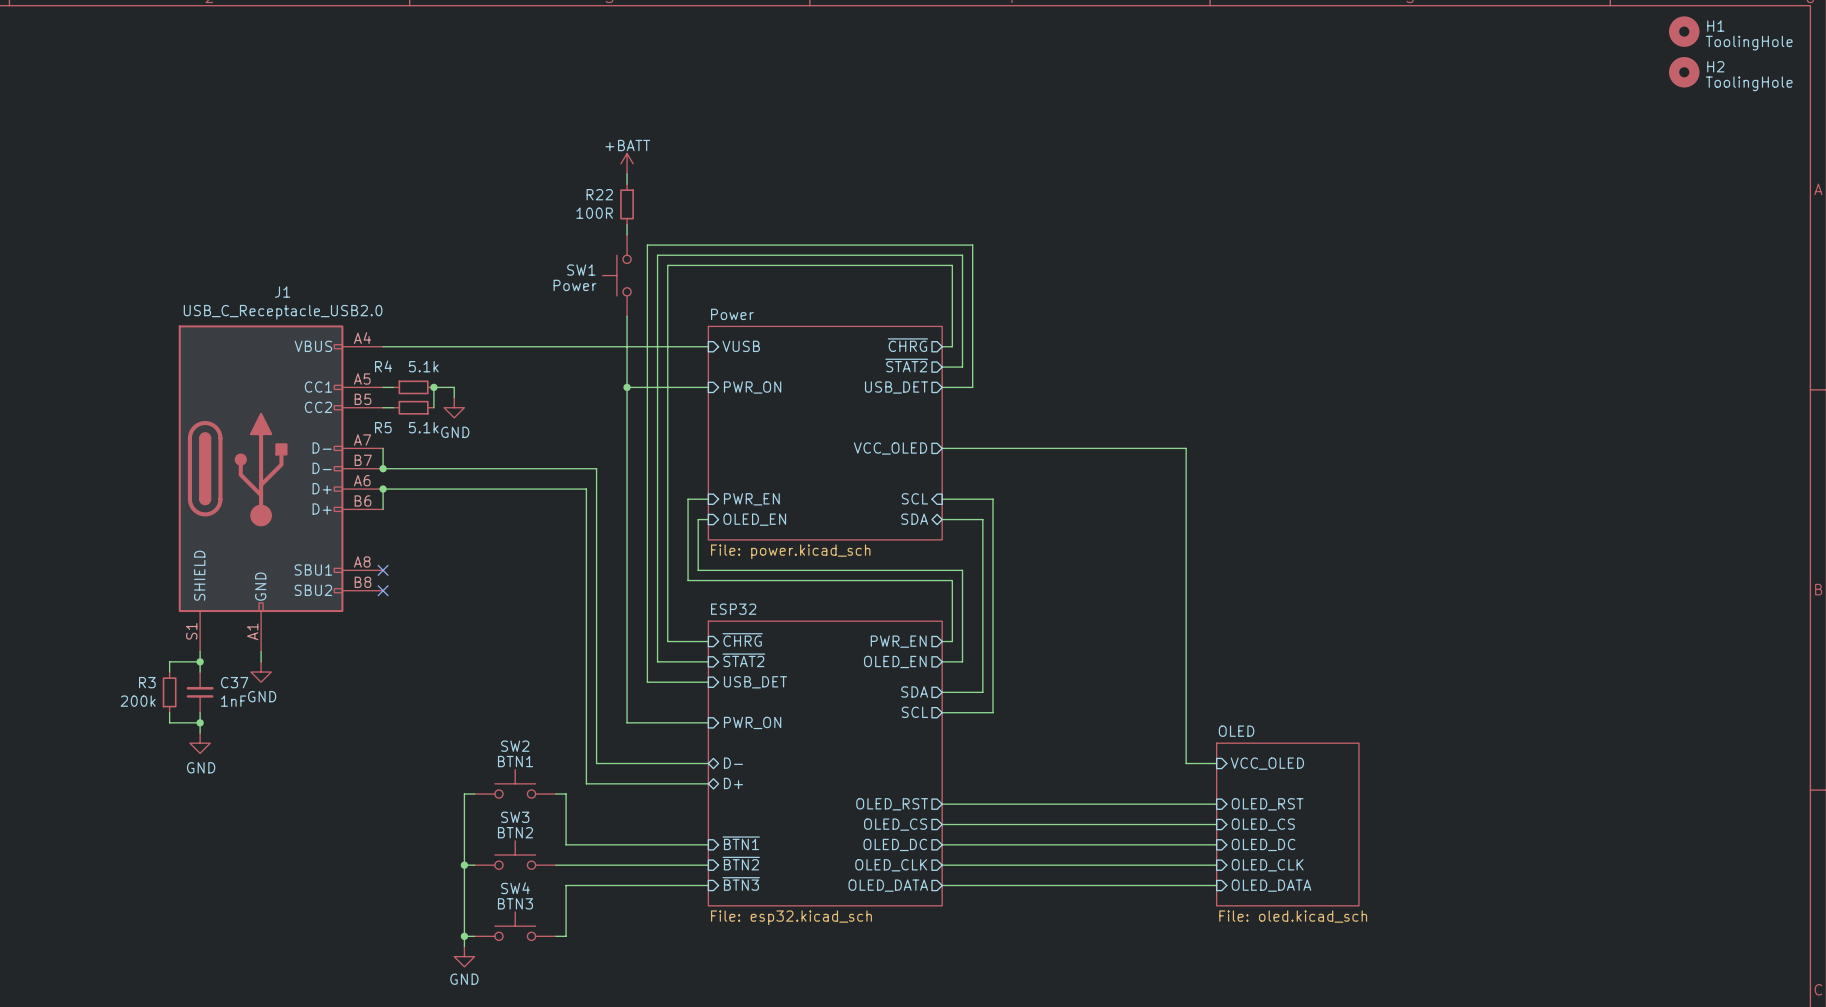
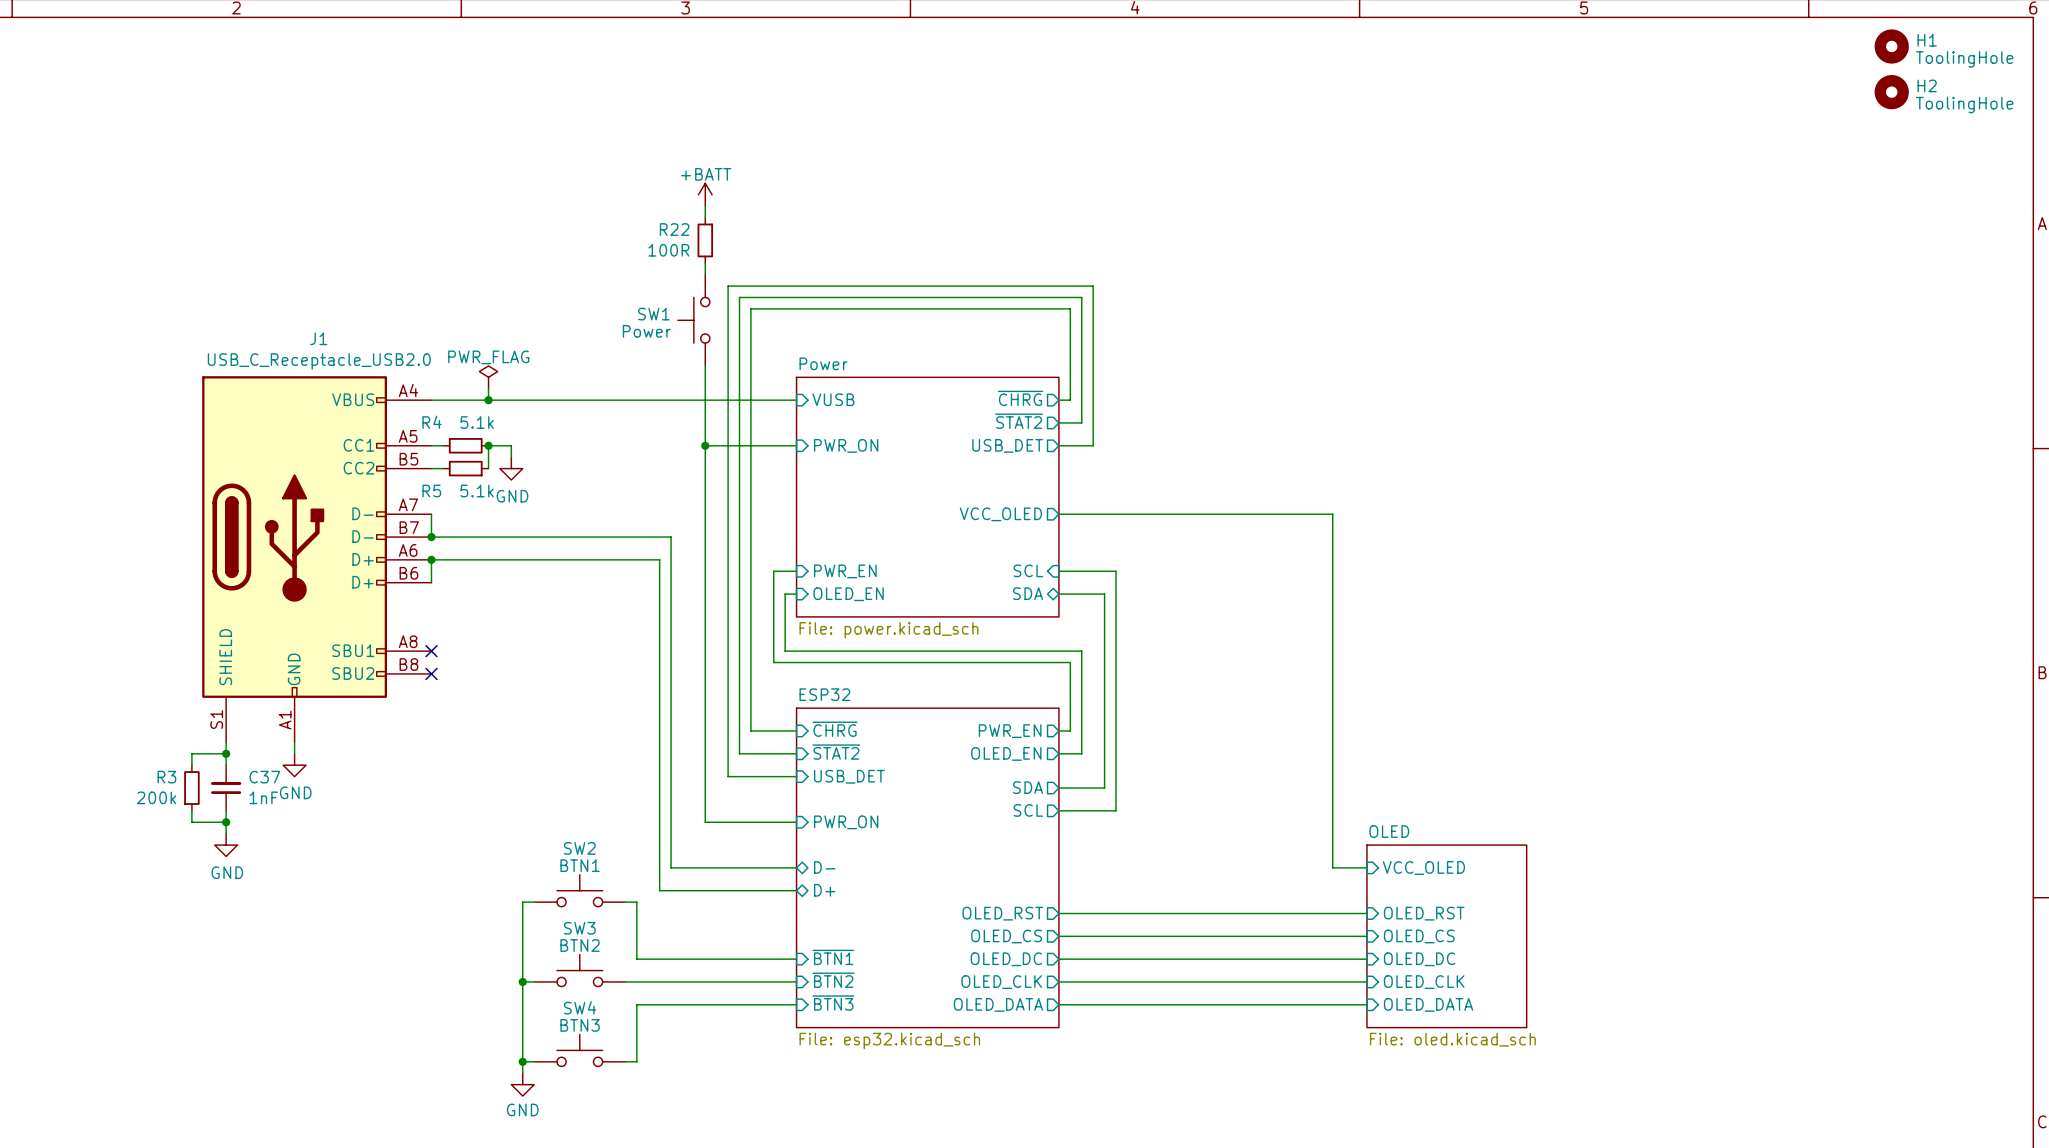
power symbol: none -> PWR_FLAG (488, 377)
wire: none -> (488, 388) (488, 400)
junction: none -> (488, 400)

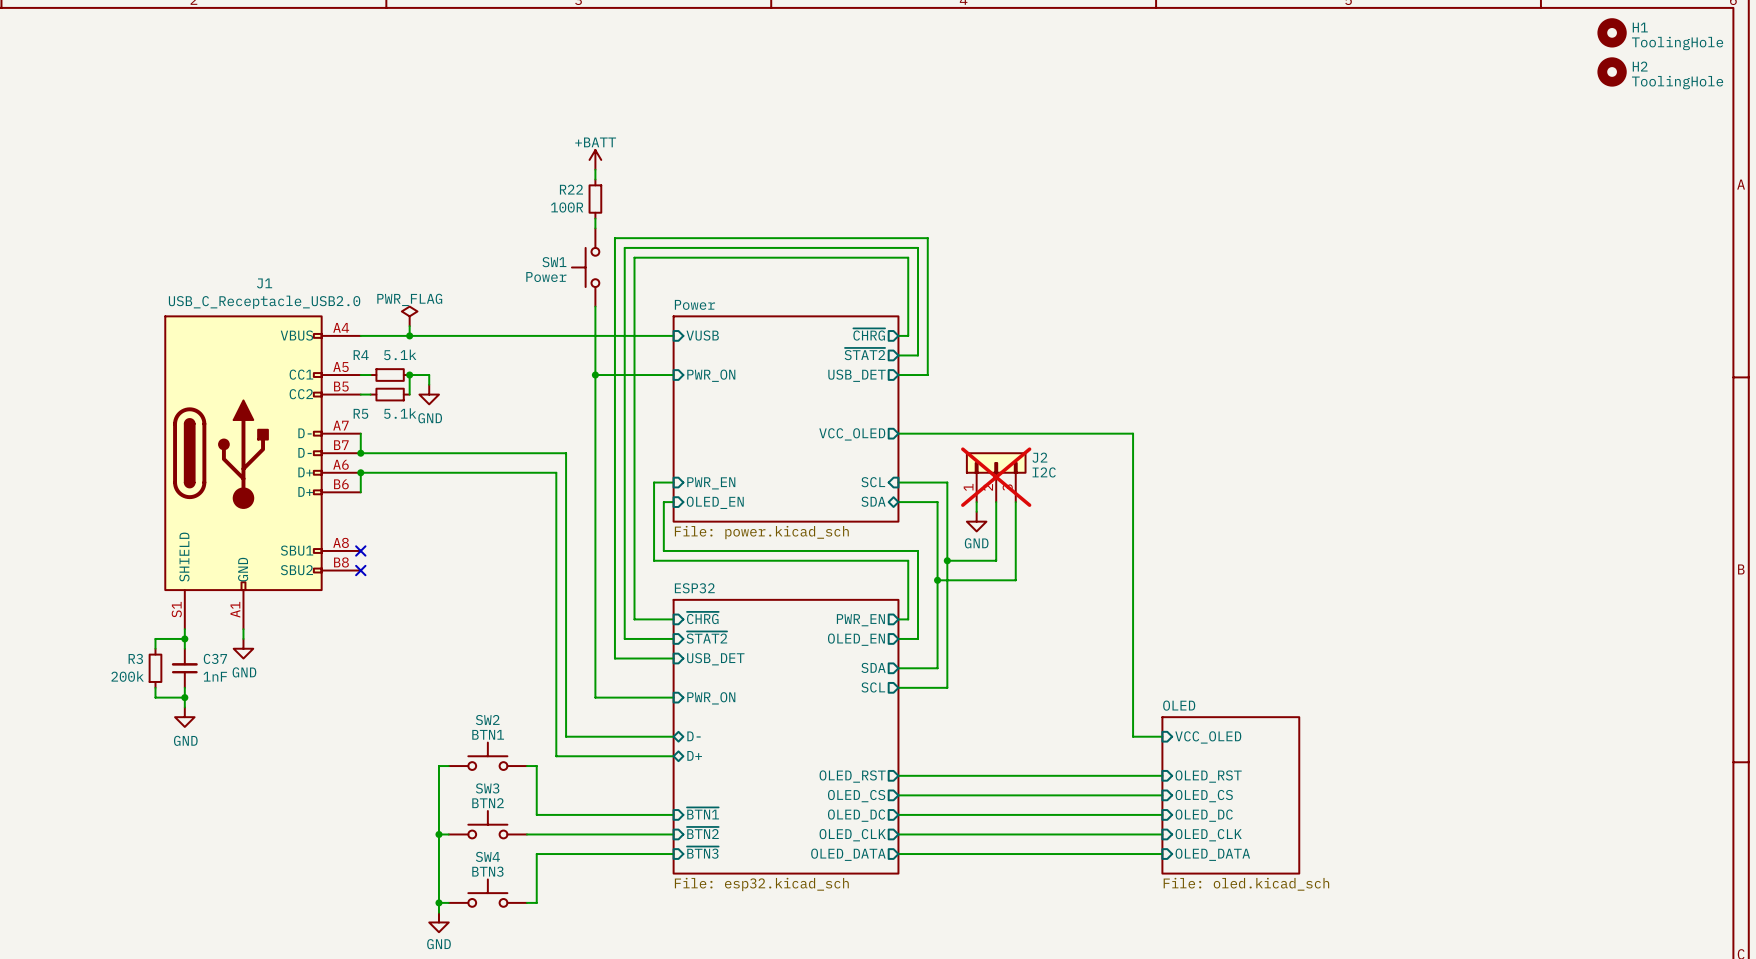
J2: none -> I2C (996, 477)
wire: none -> (976, 502) (976, 511)
wire: none -> (996, 502) (996, 560) (947, 560)
wire: none -> (1015, 502) (1015, 580) (937, 580)
power symbol: none -> GND (976, 521)
junction: none -> (947, 560)
junction: none -> (937, 580)

